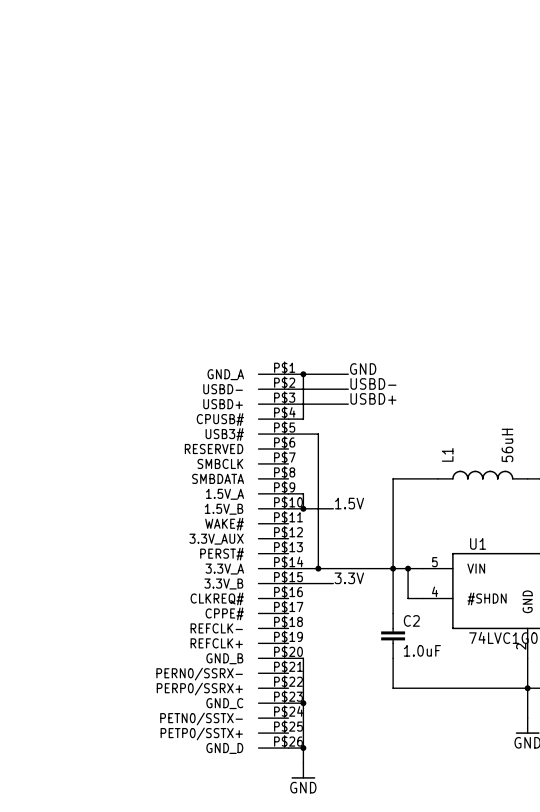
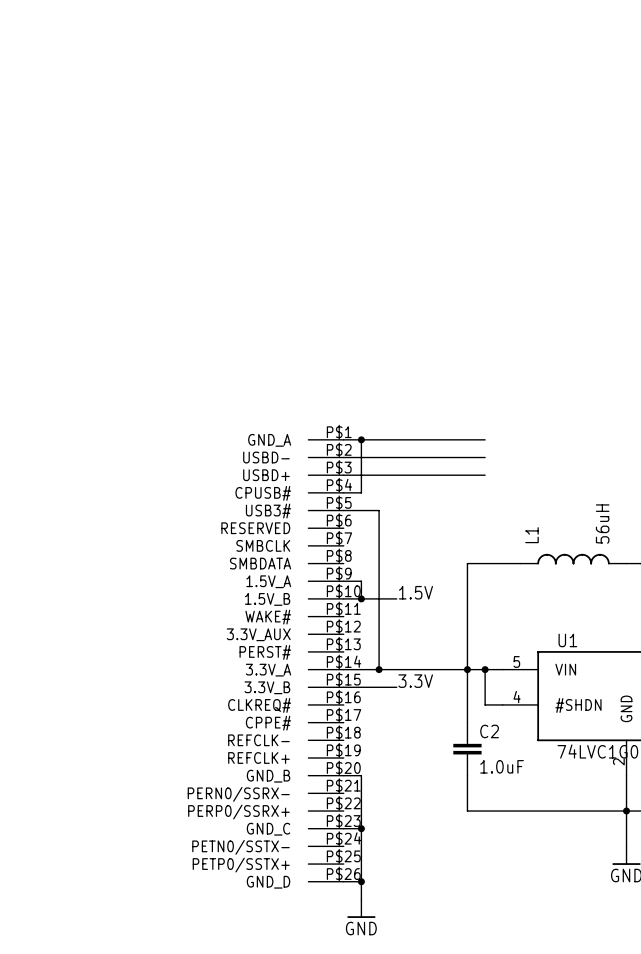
label: GND (363, 369) -> none
wire: none -> (414, 439) (485, 439)
label: USBD- (373, 383) -> none
wire: none -> (414, 457) (485, 457)
label: USBD+ (373, 398) -> none
wire: none -> (414, 475) (485, 475)

